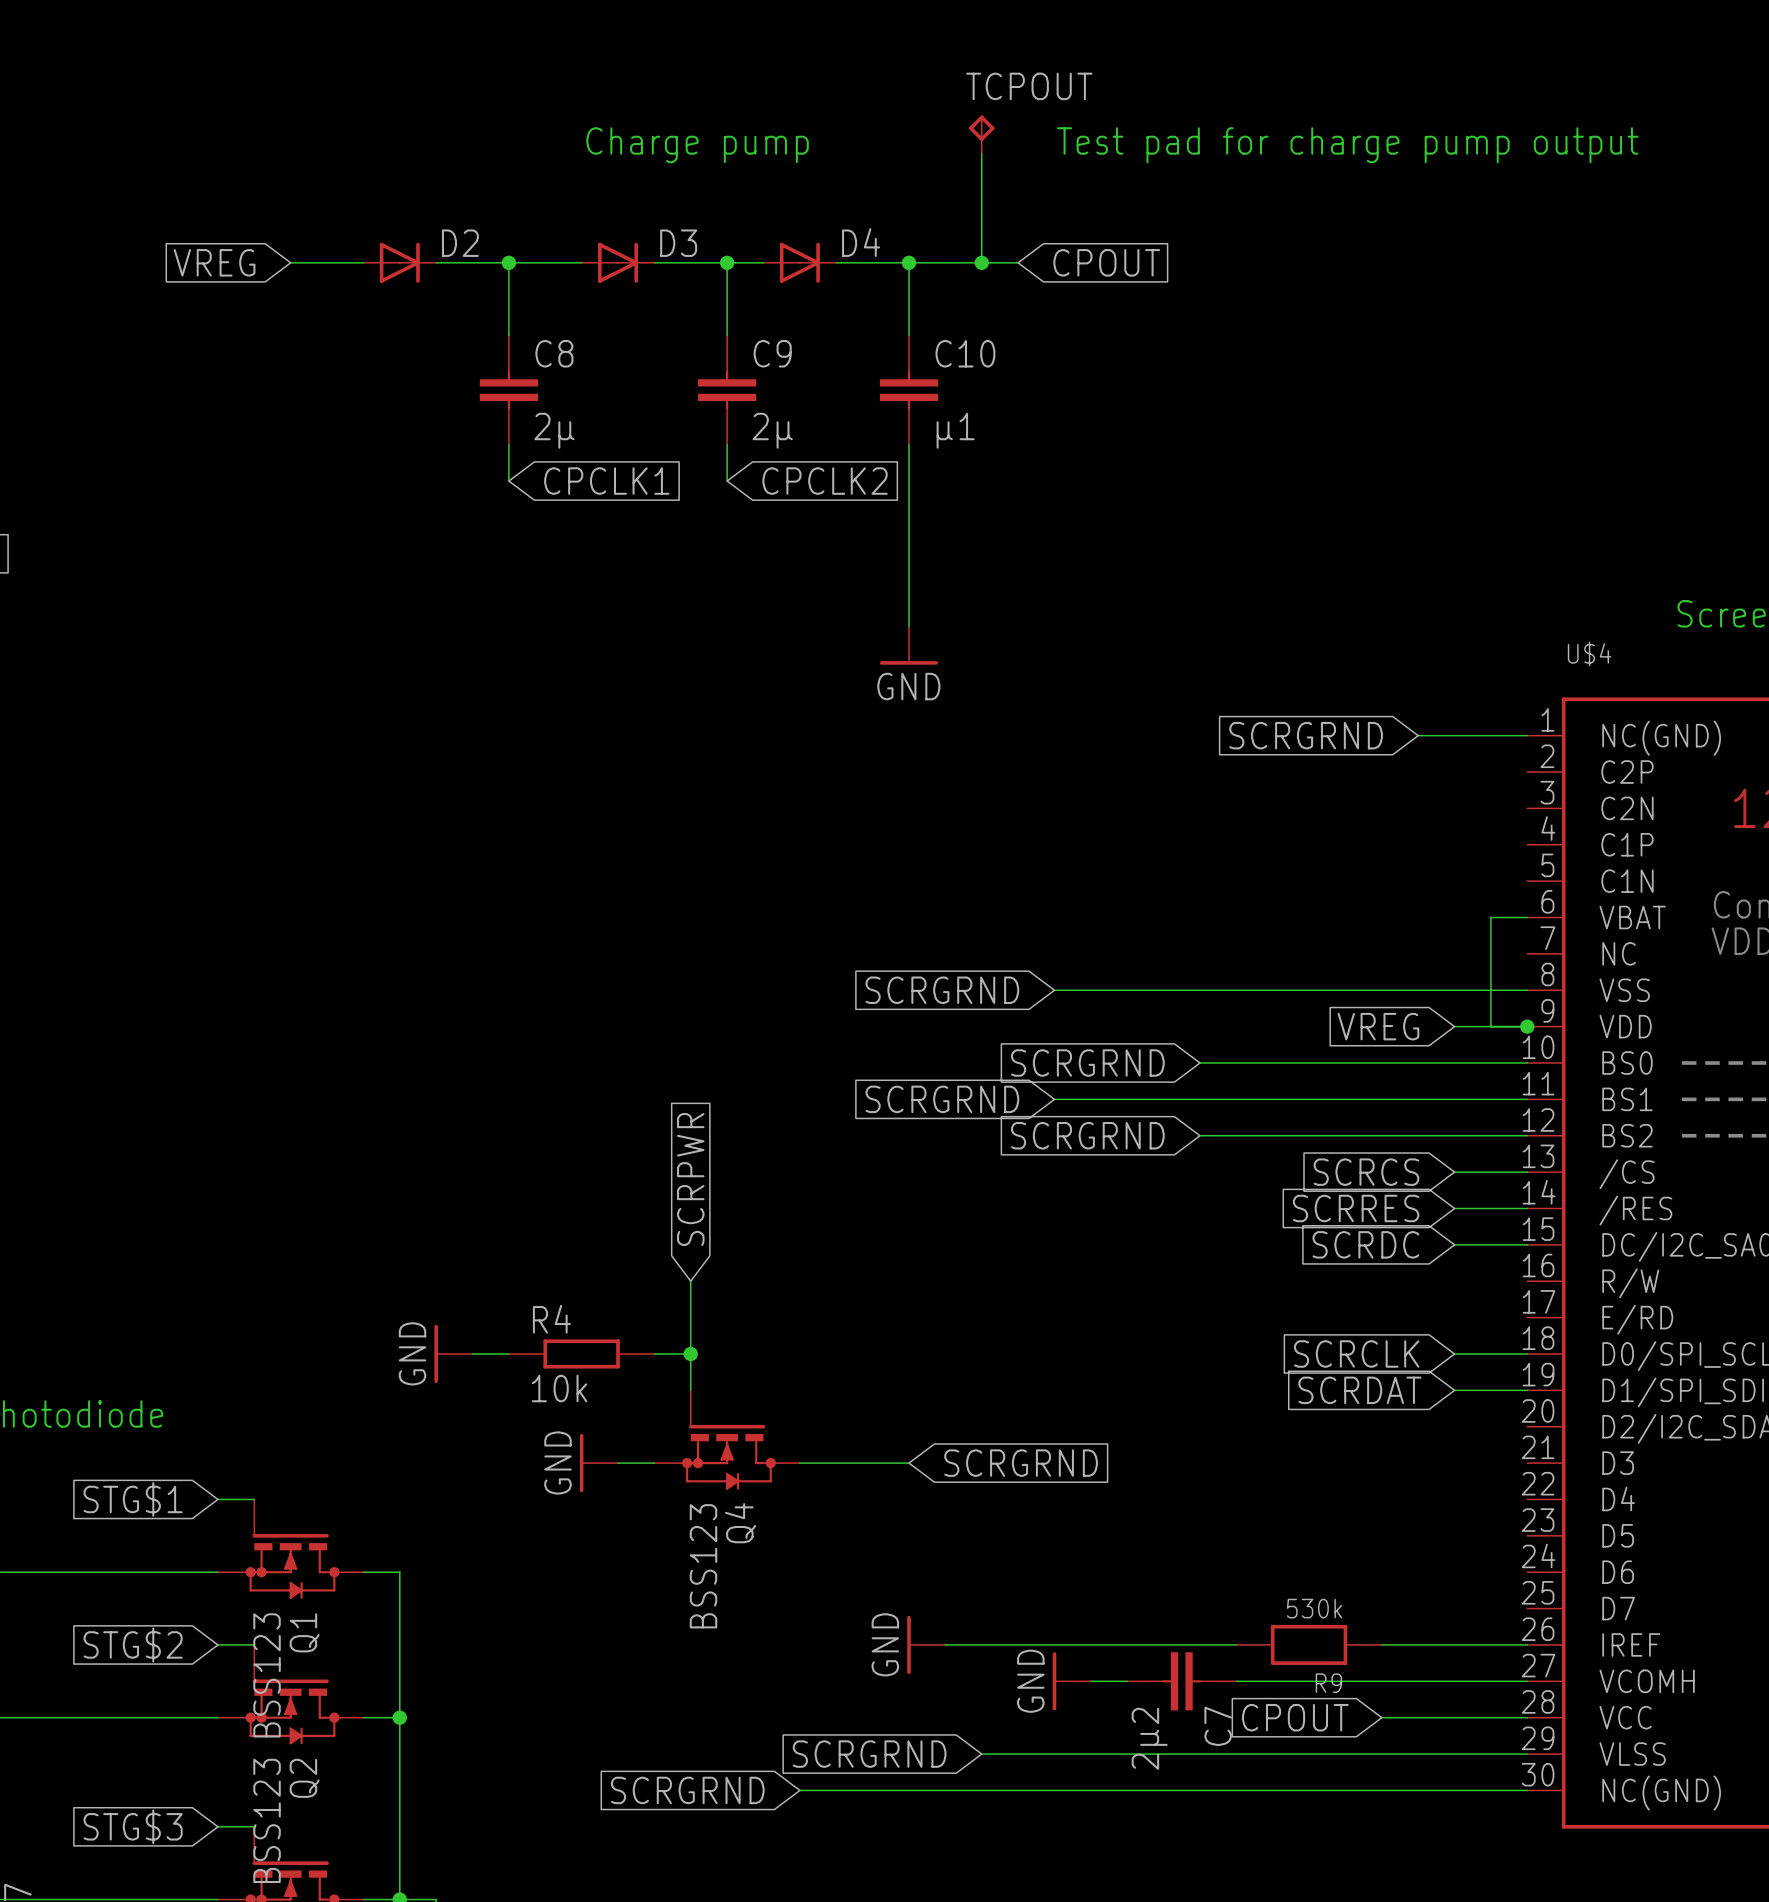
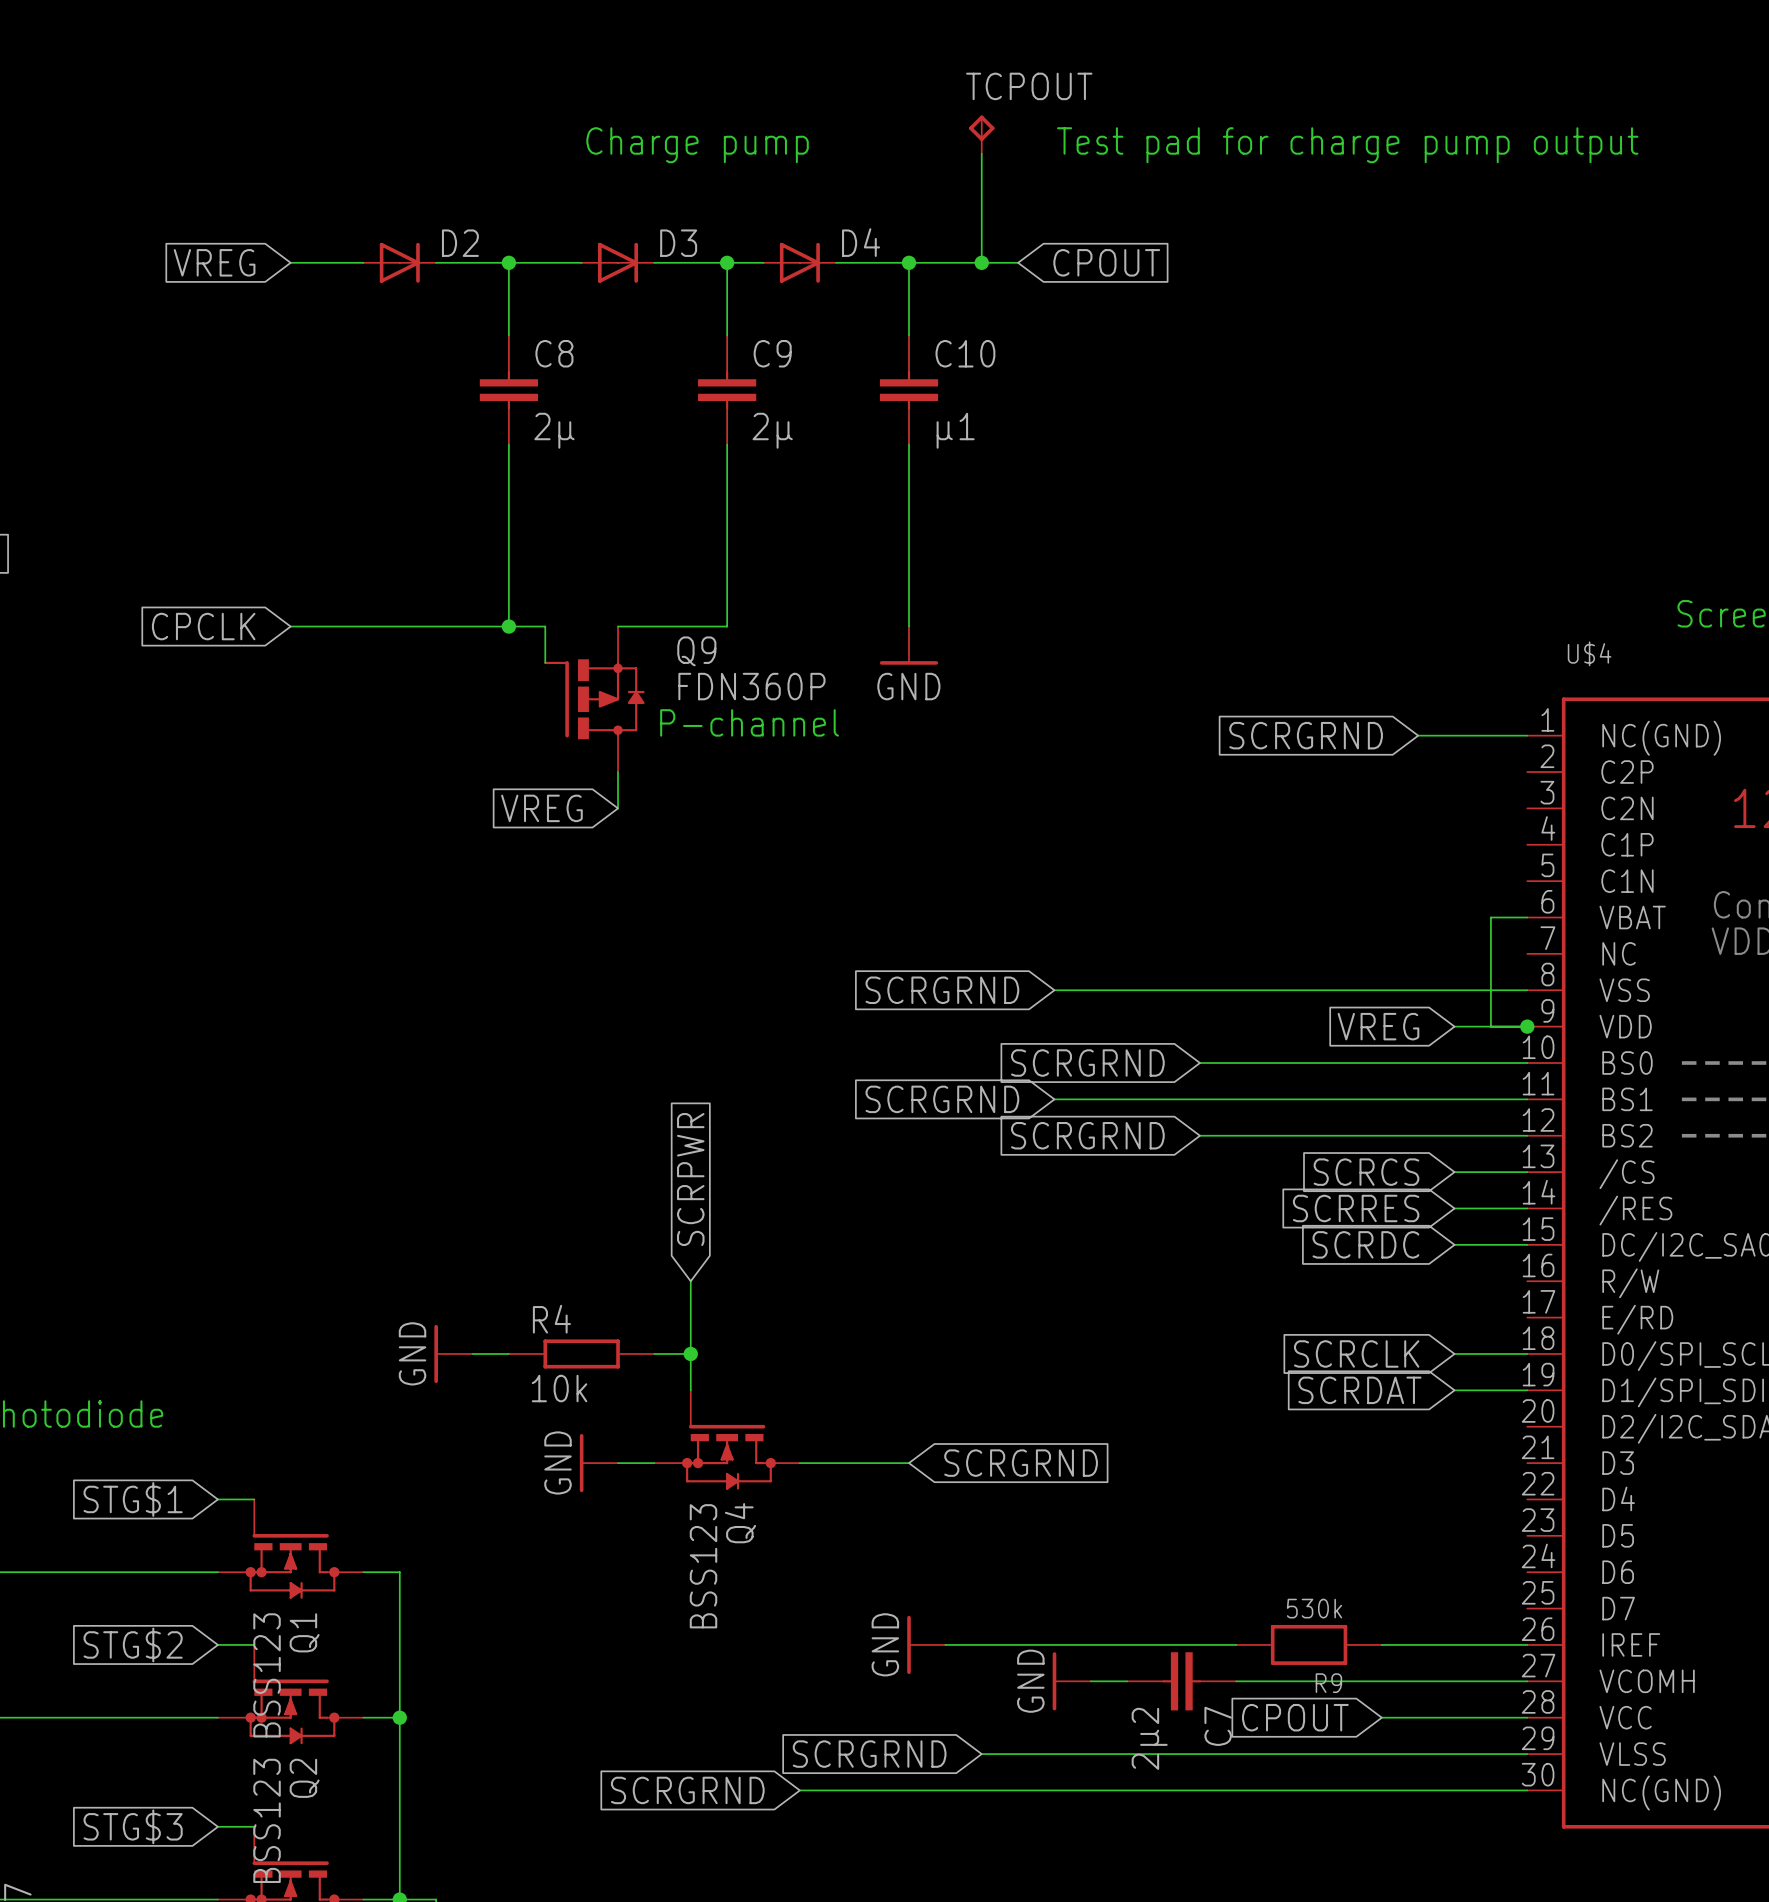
wire: none -> (508, 481) (508, 626)
global label: CPCLK1 (606, 481) -> none
wire: none -> (727, 481) (727, 626) (618, 626)
global label: CPCLK2 (825, 481) -> none
global label: none -> CPCLK (203, 626)
wire: none -> (290, 626) (545, 626) (545, 662)
junction: none -> (508, 626)
Q9: none -> FDN360P (594, 699)
text: none -> P-channel (749, 722)
wire: none -> (618, 772) (618, 808)
global label: none -> VREG (541, 808)

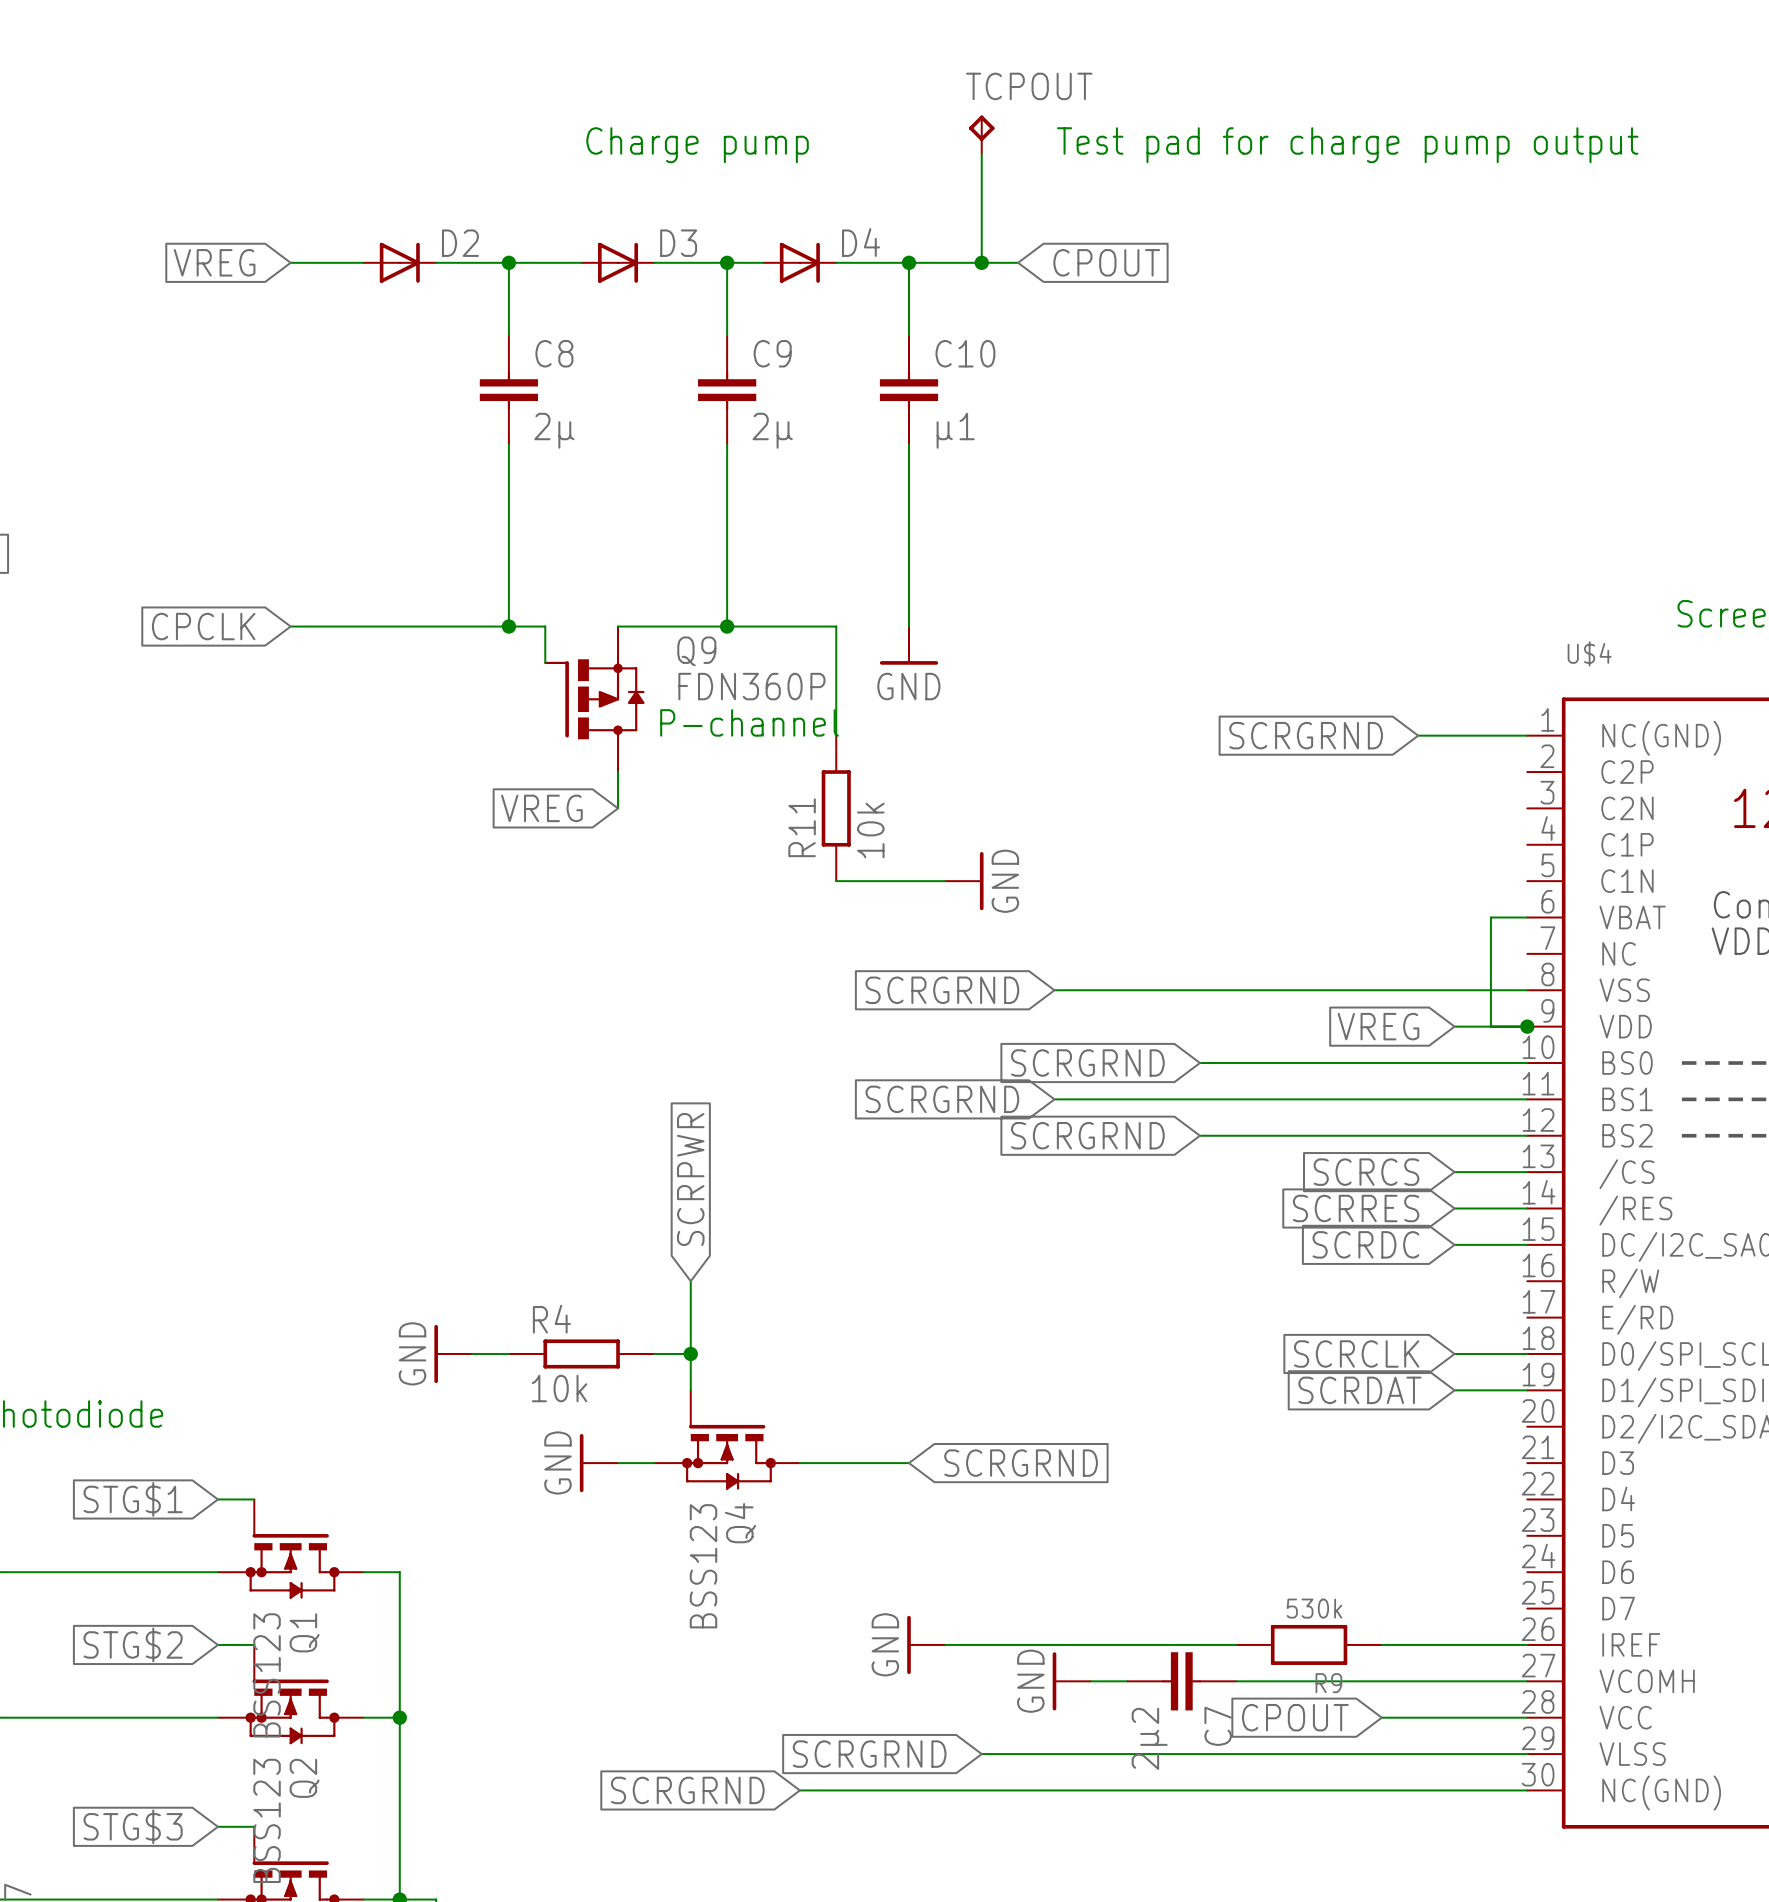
wire: none -> (727, 626) (836, 626) (836, 735)
junction: none -> (727, 626)
R11: none -> 10k (836, 808)
wire: none -> (836, 881) (945, 881)
power symbol: none -> GND (964, 881)

